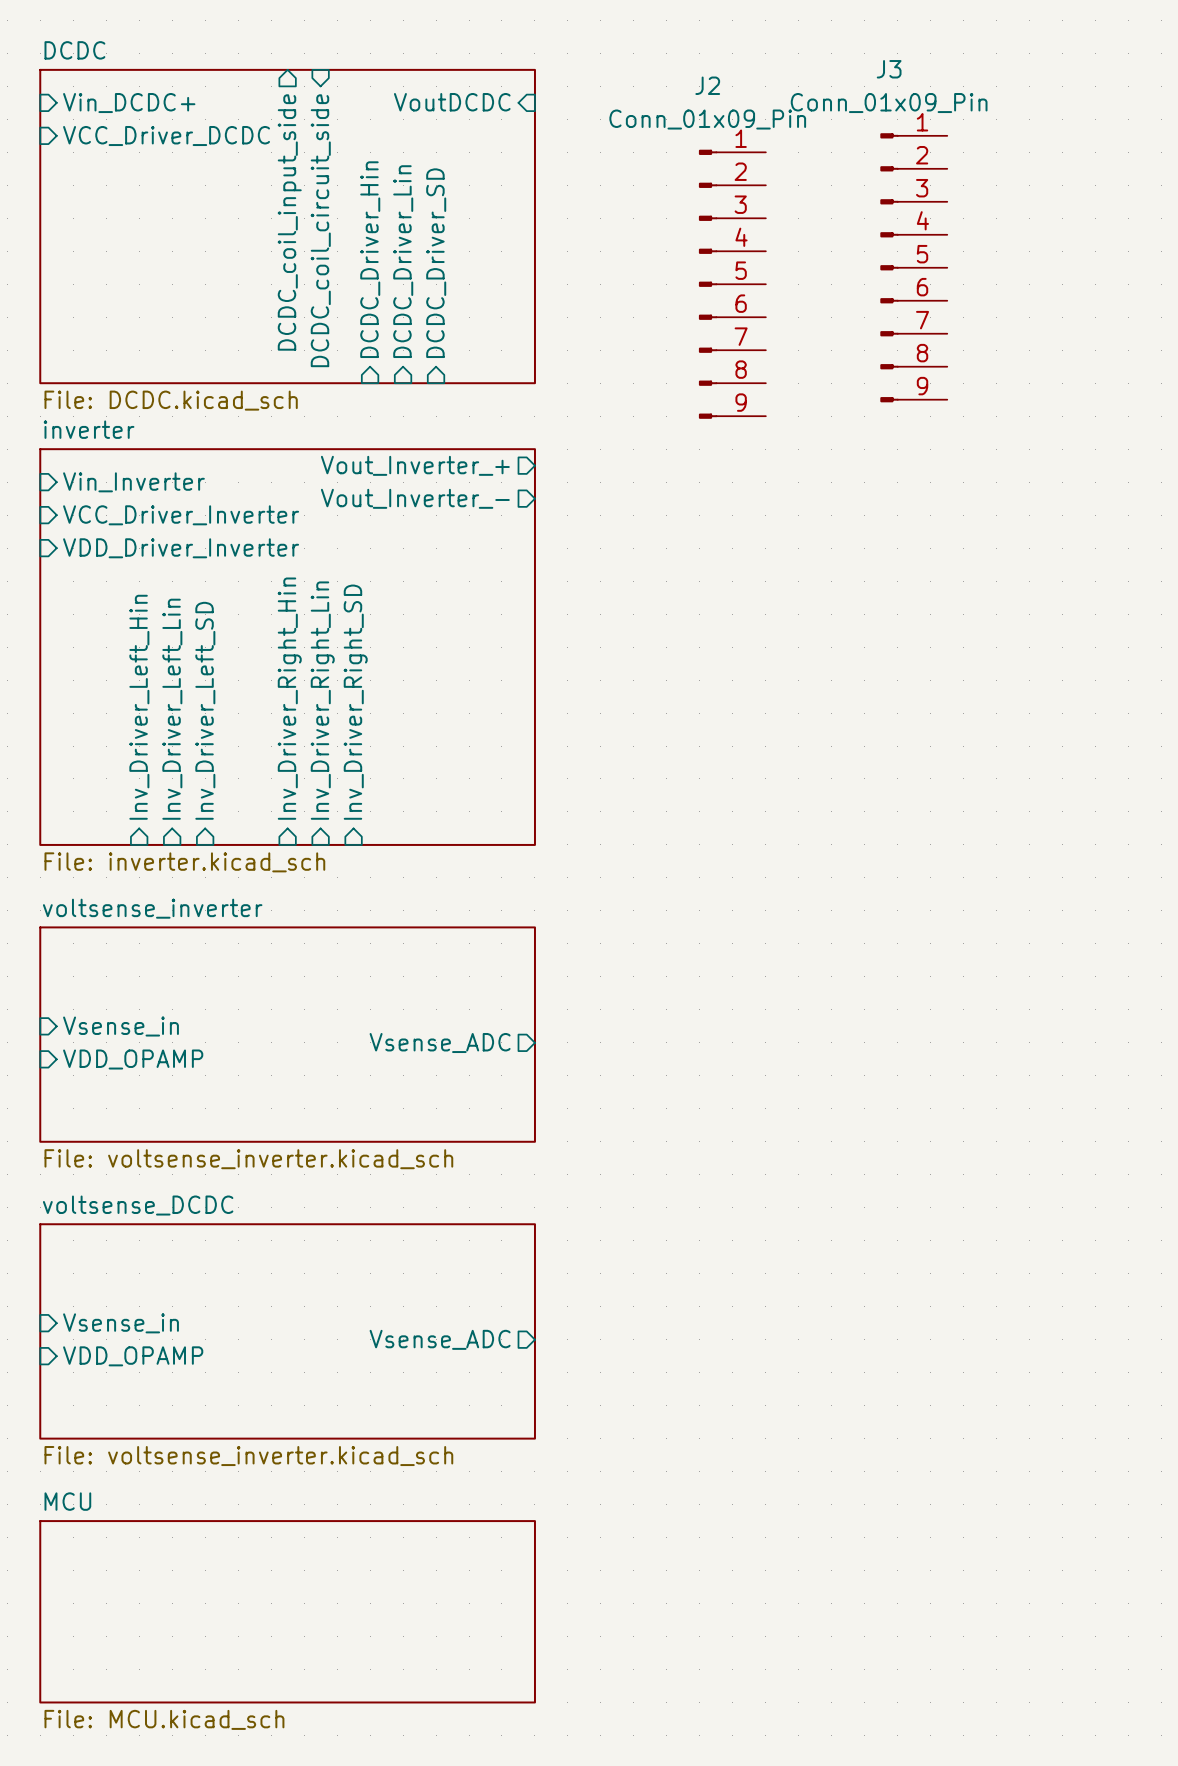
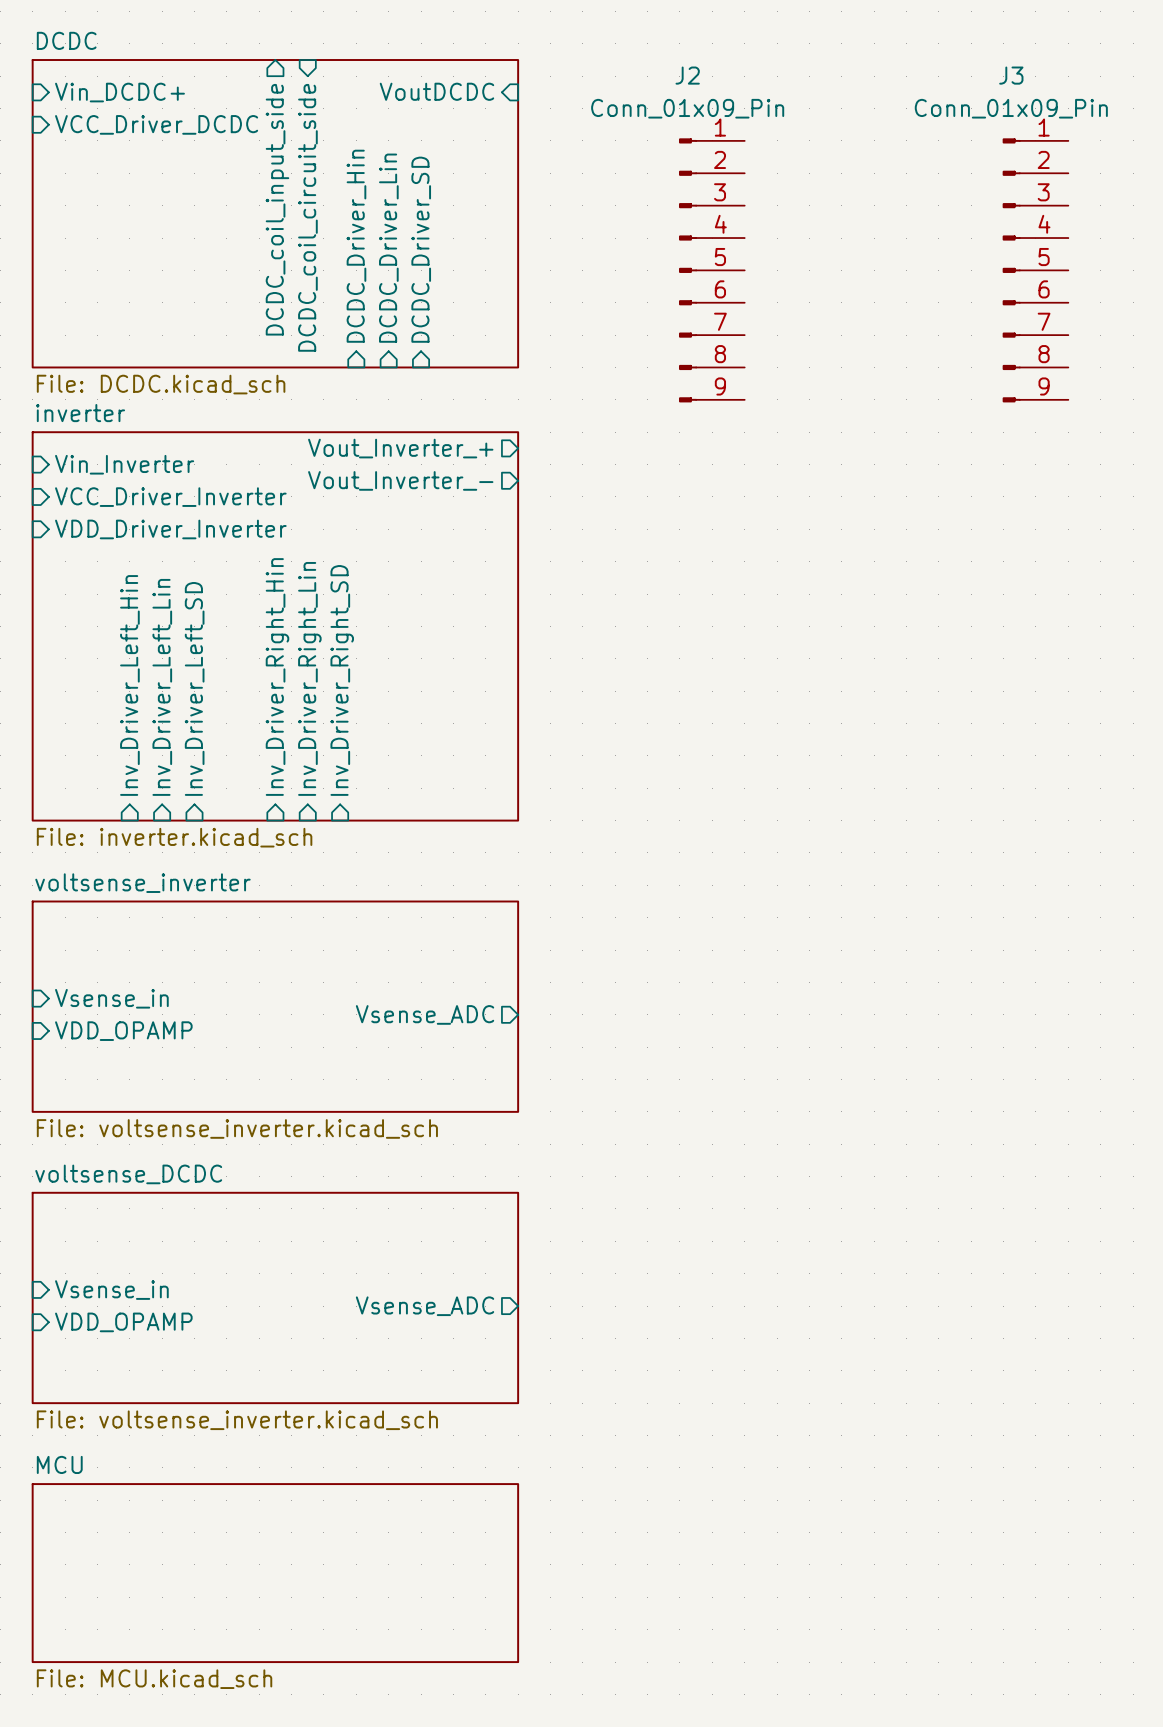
J3 position: (913, 267) -> (1035, 270)

